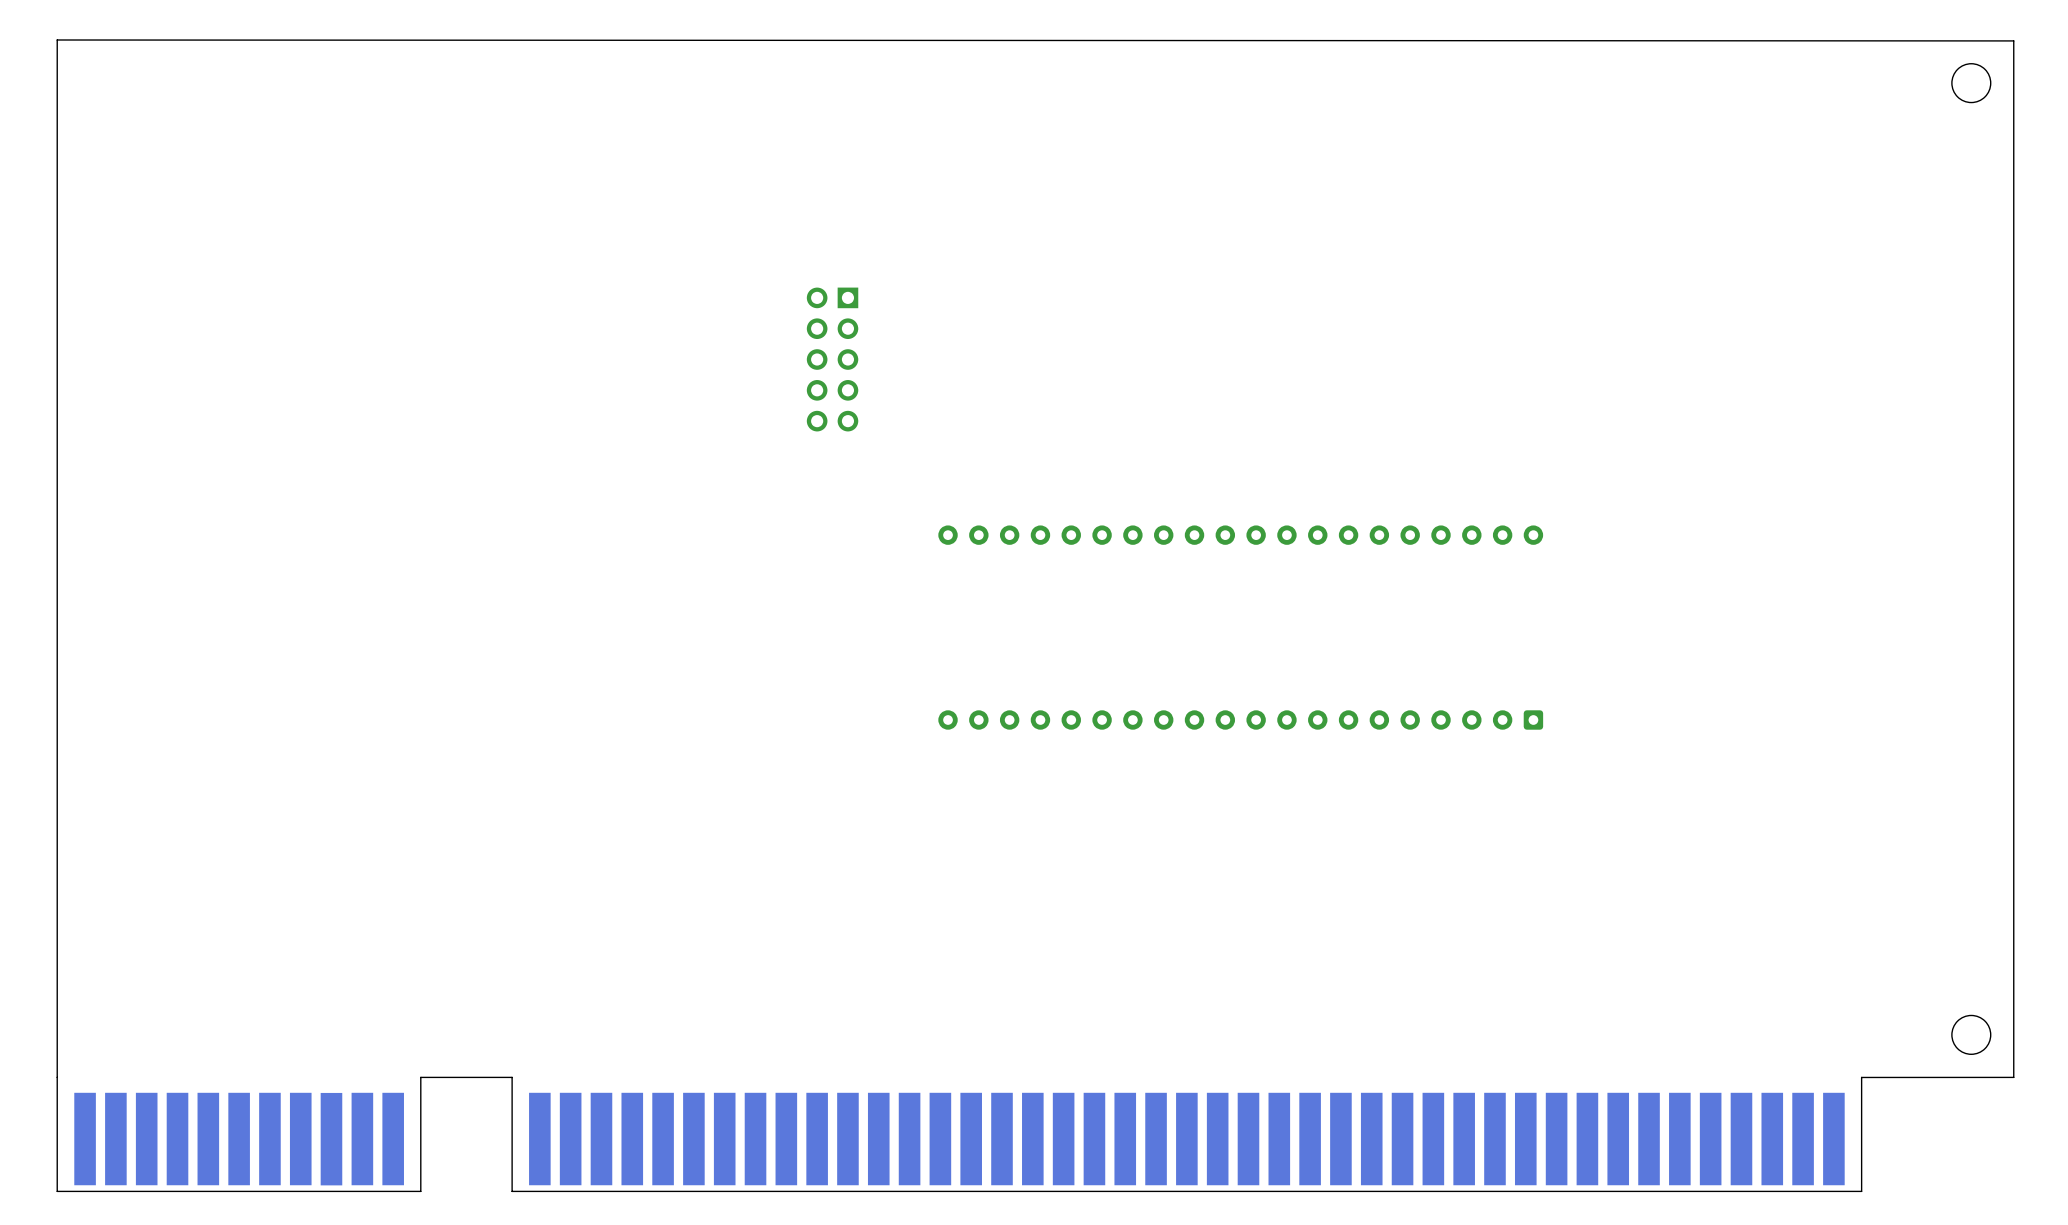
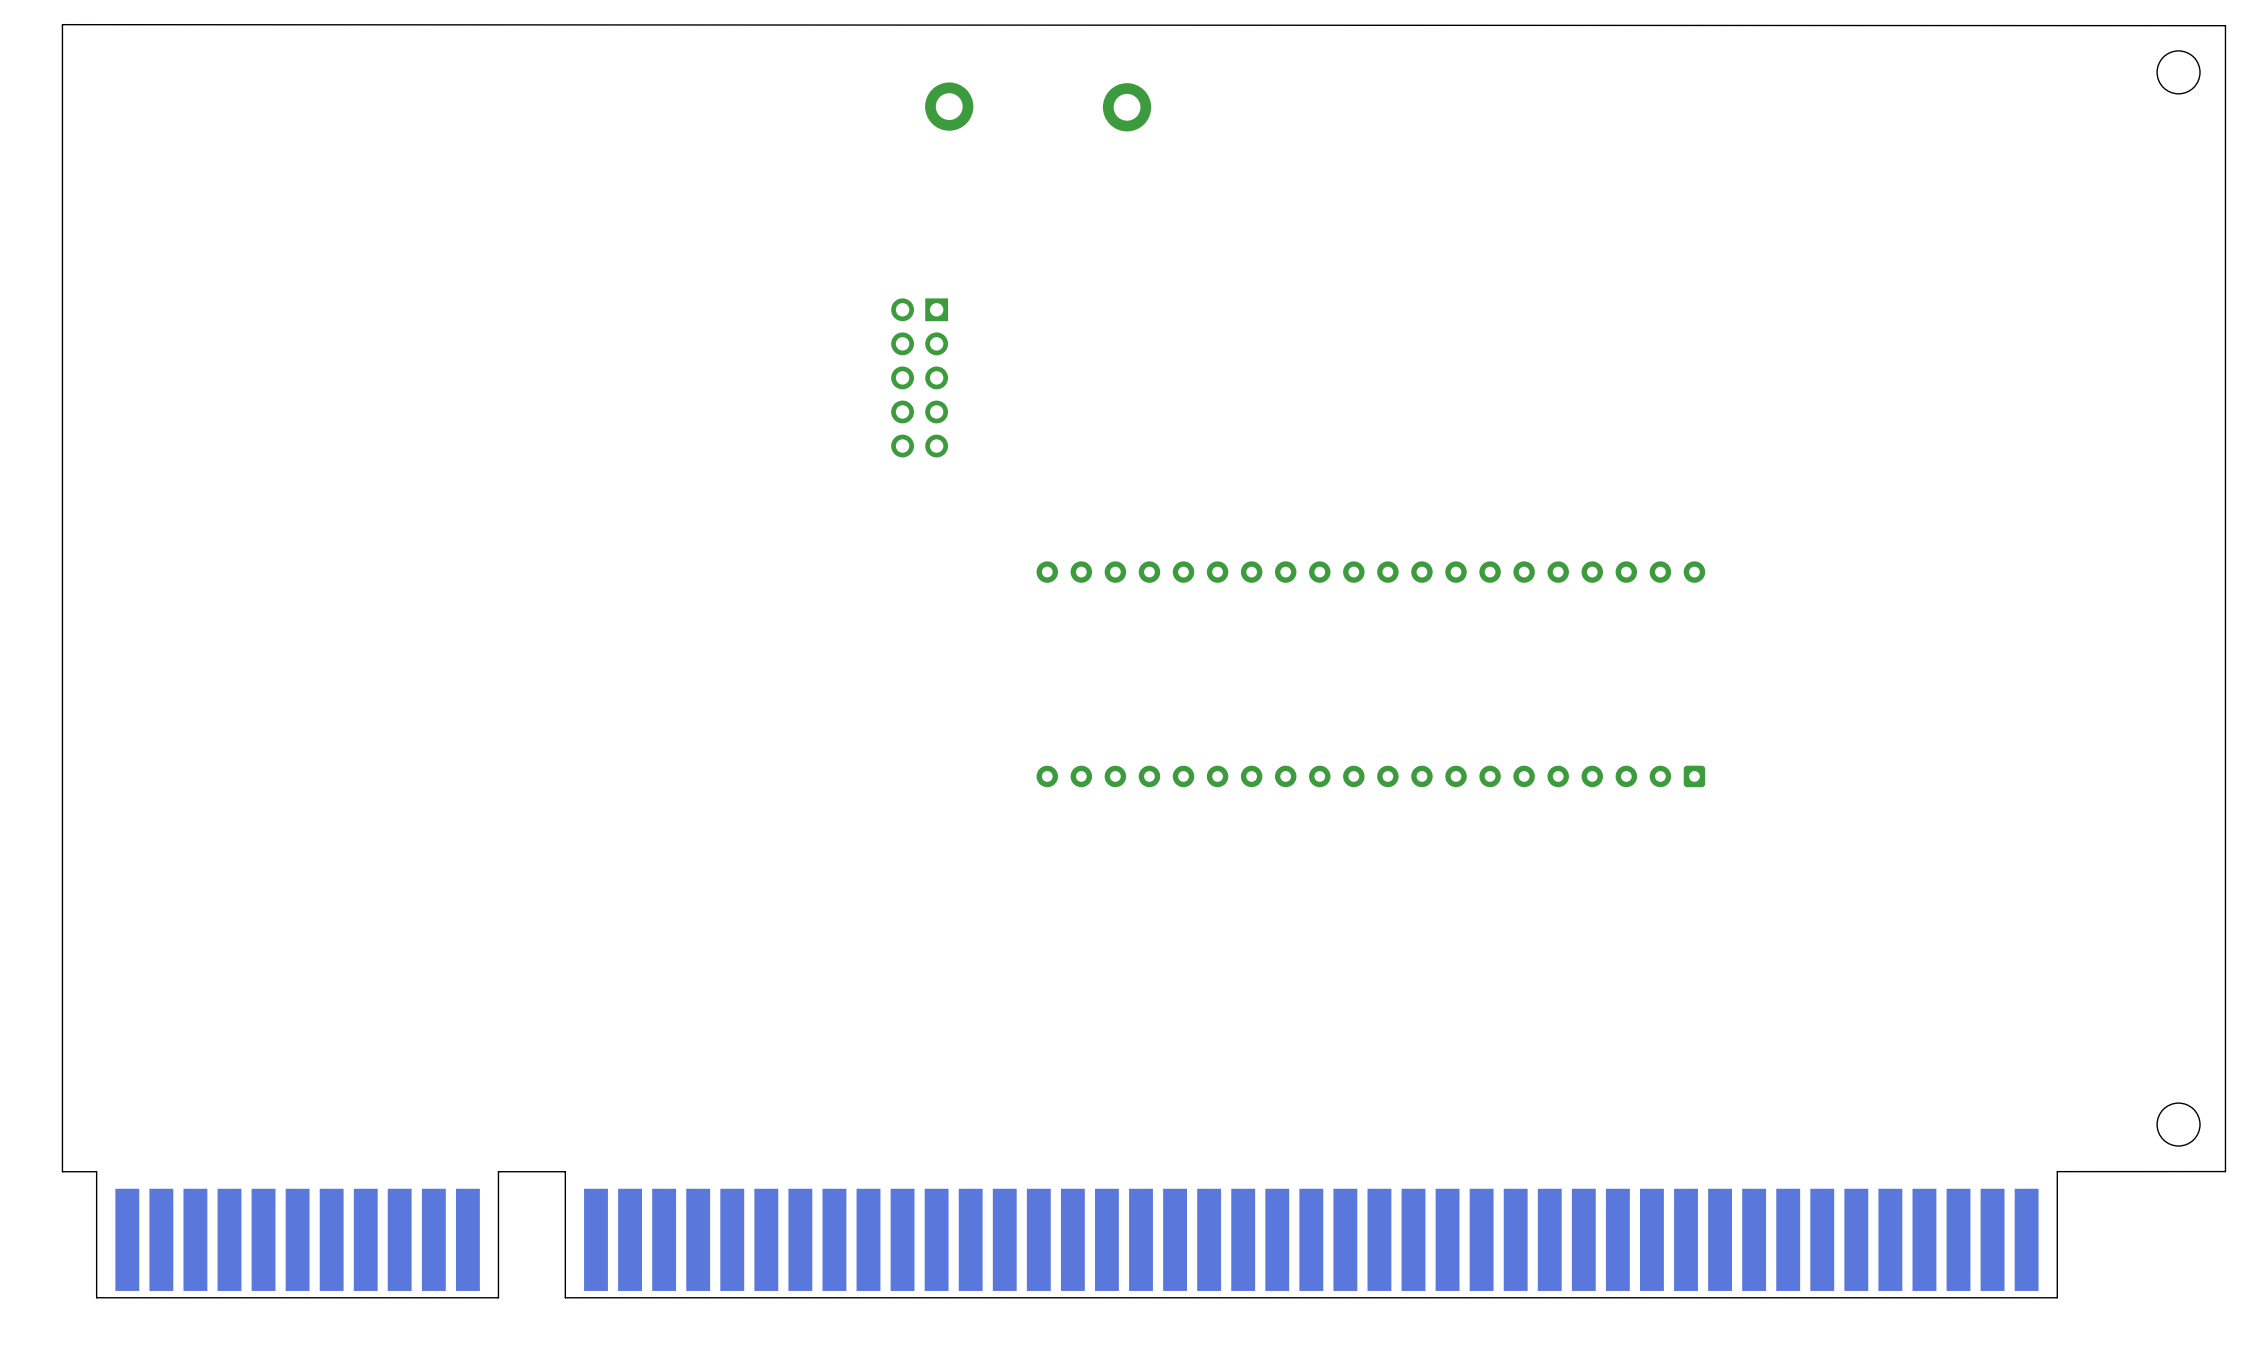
part: none -> (949, 106)
part: none -> (1127, 107)
board edge: none -> (96, 1171) (62, 1171)
part: (959, 1134) -> none
part: none -> (1076, 1234)

